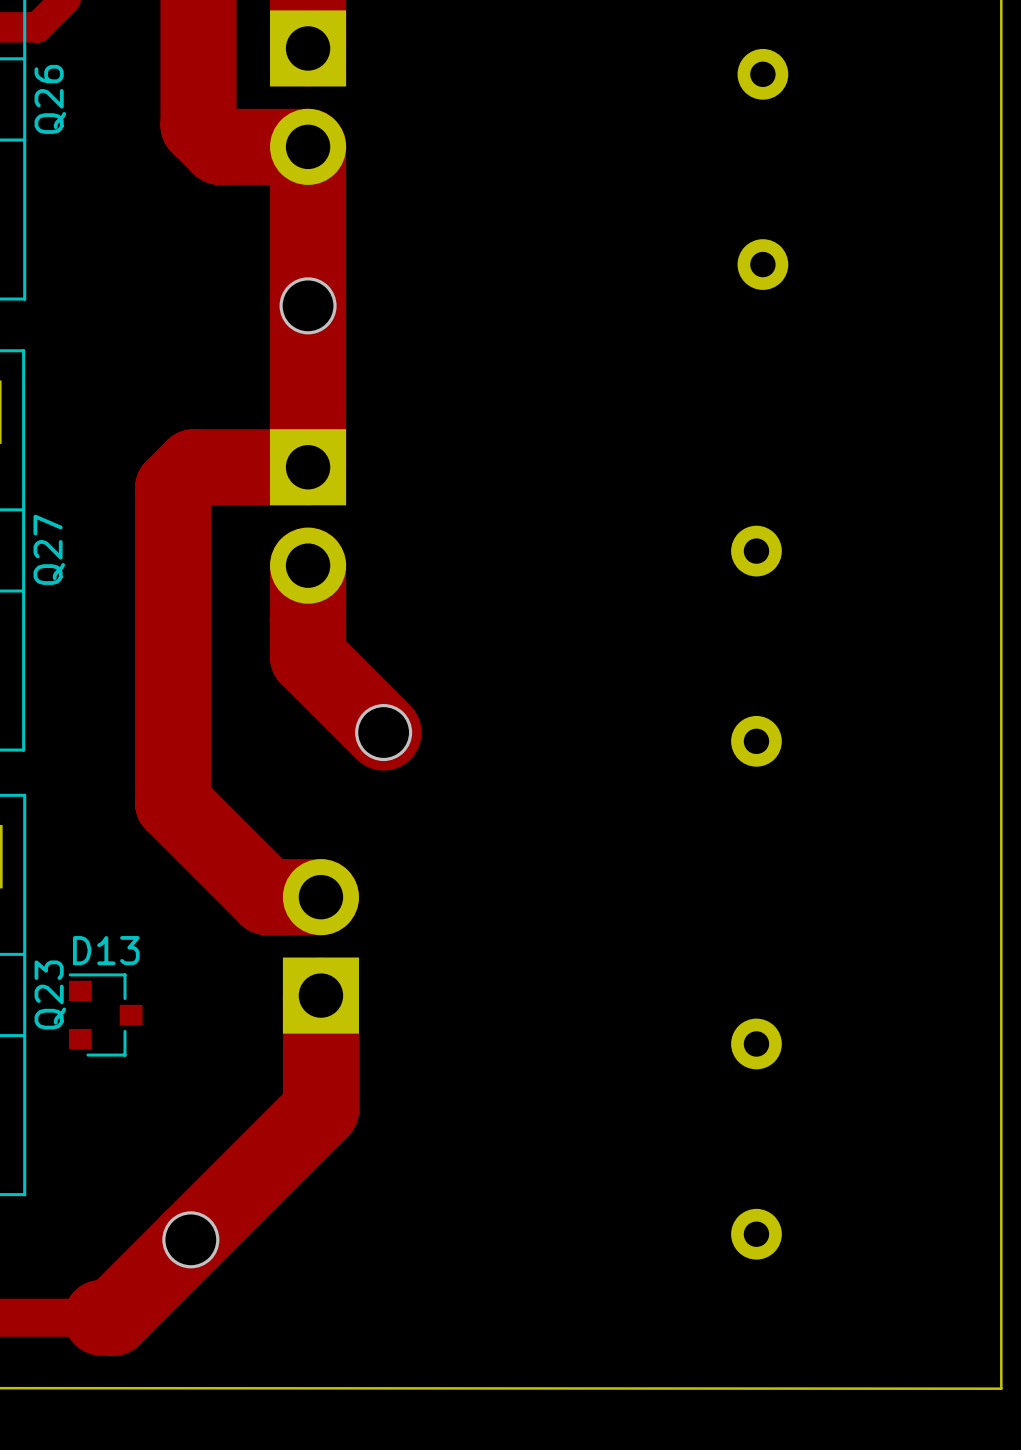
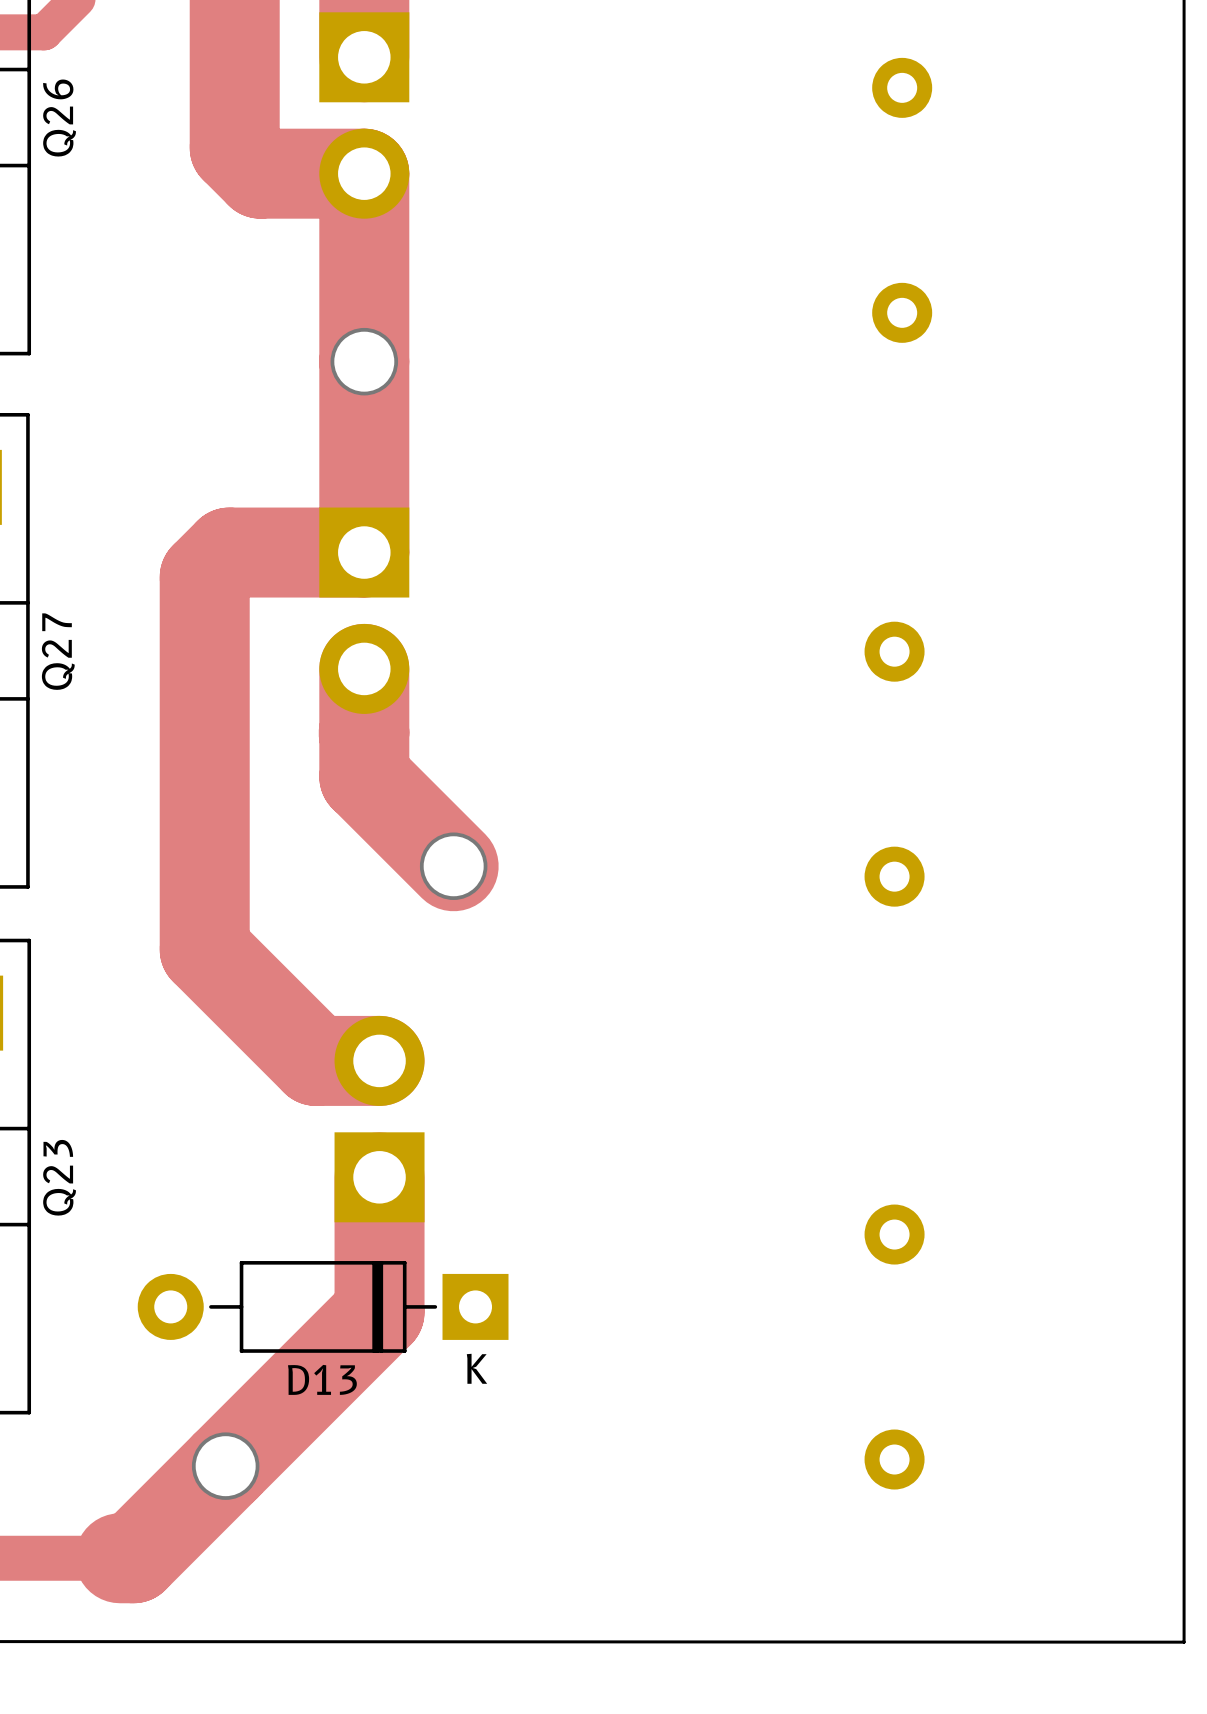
D13 name position: D13 (106, 950) -> D13 (322, 1379)
D13 footprint: [68, 973, 143, 1057] -> [137, 1261, 509, 1353]

